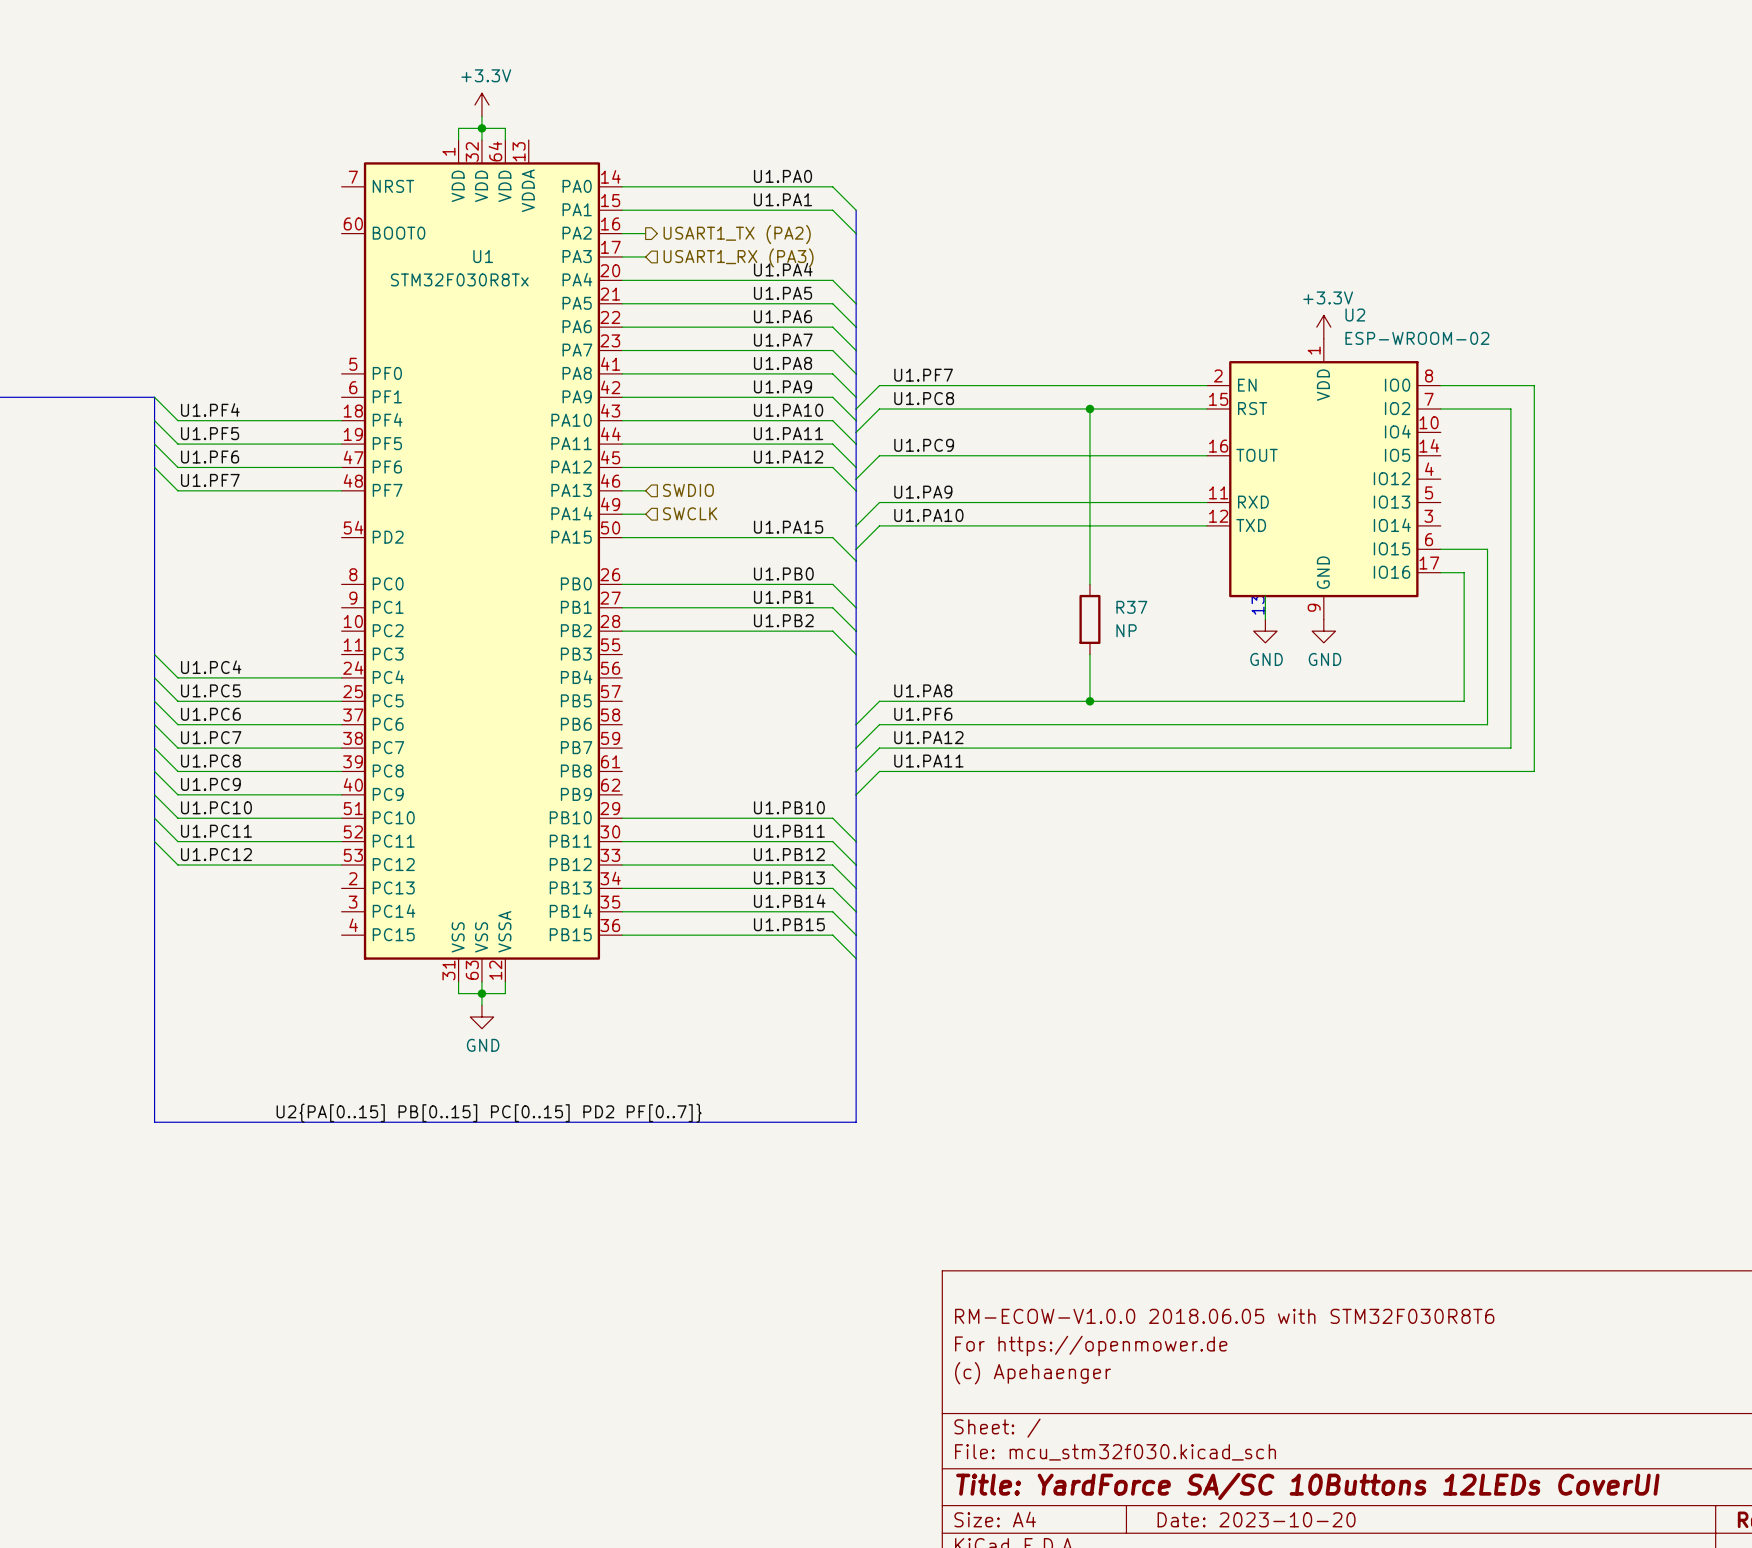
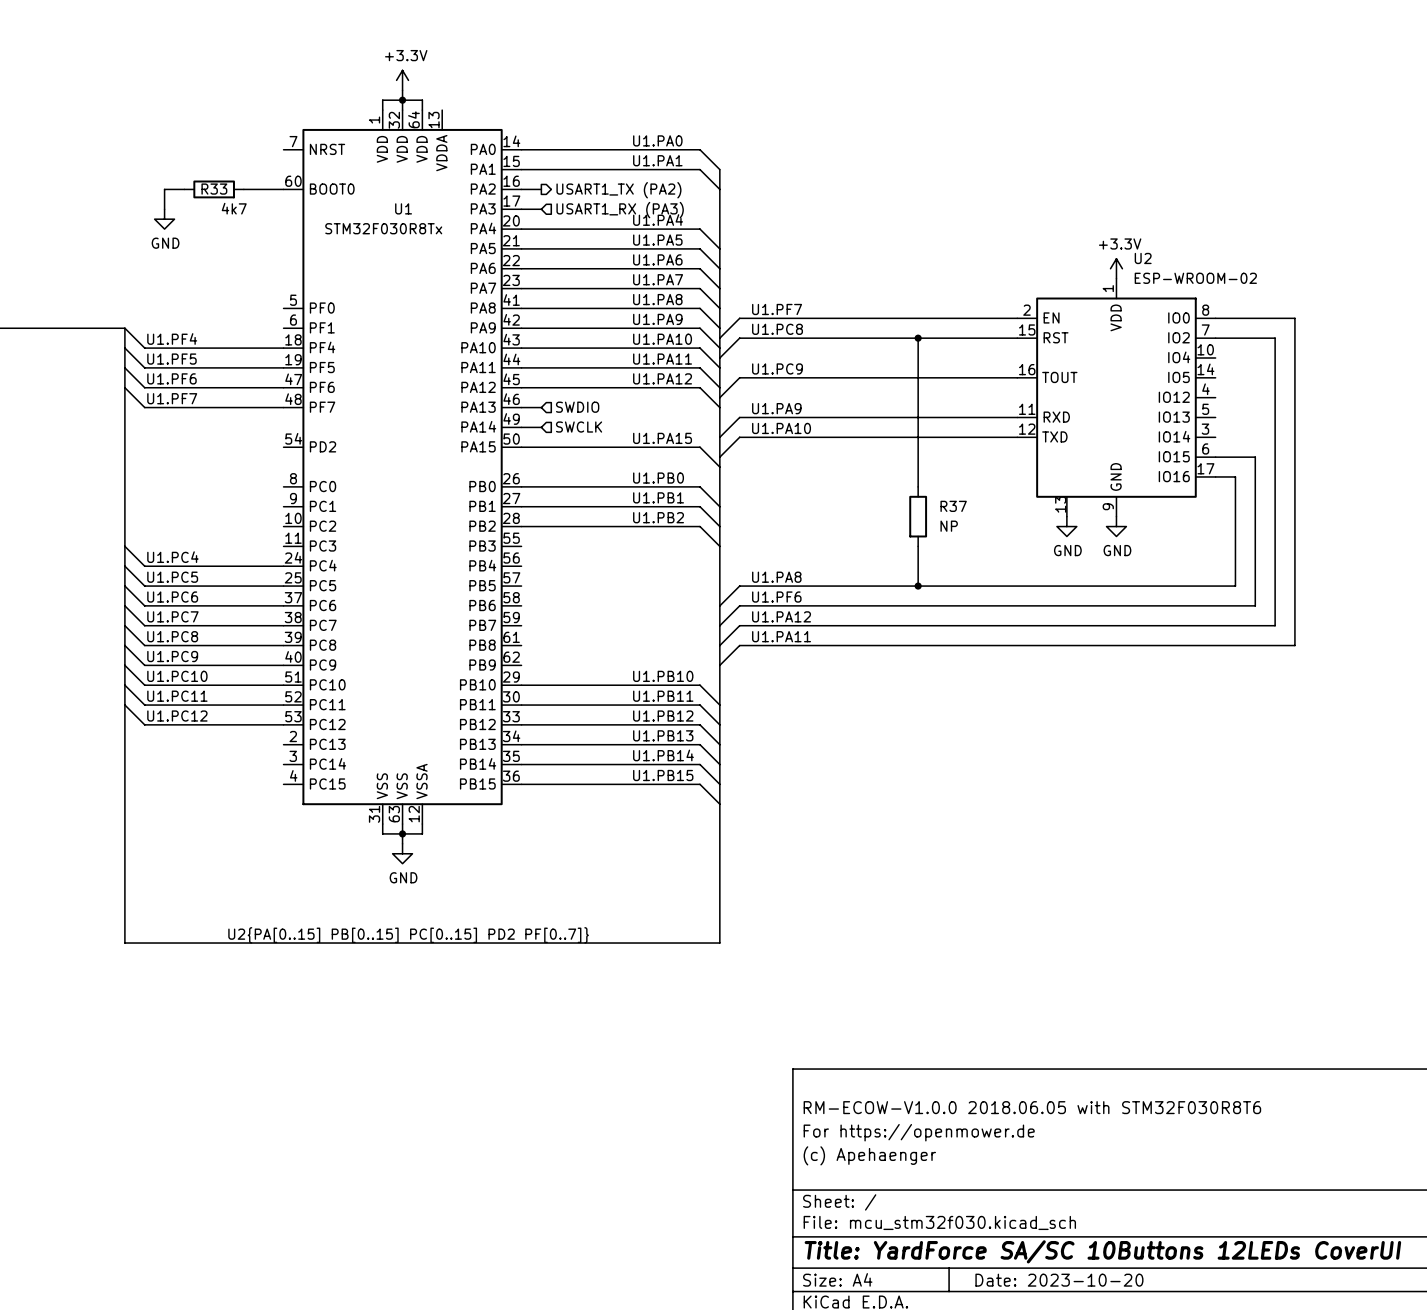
wire: none -> (184, 189) (164, 189) (164, 209)
R33: none -> 4k7 (214, 189)
wire: none -> (243, 189) (283, 189)
power symbol: none -> GND (164, 219)

